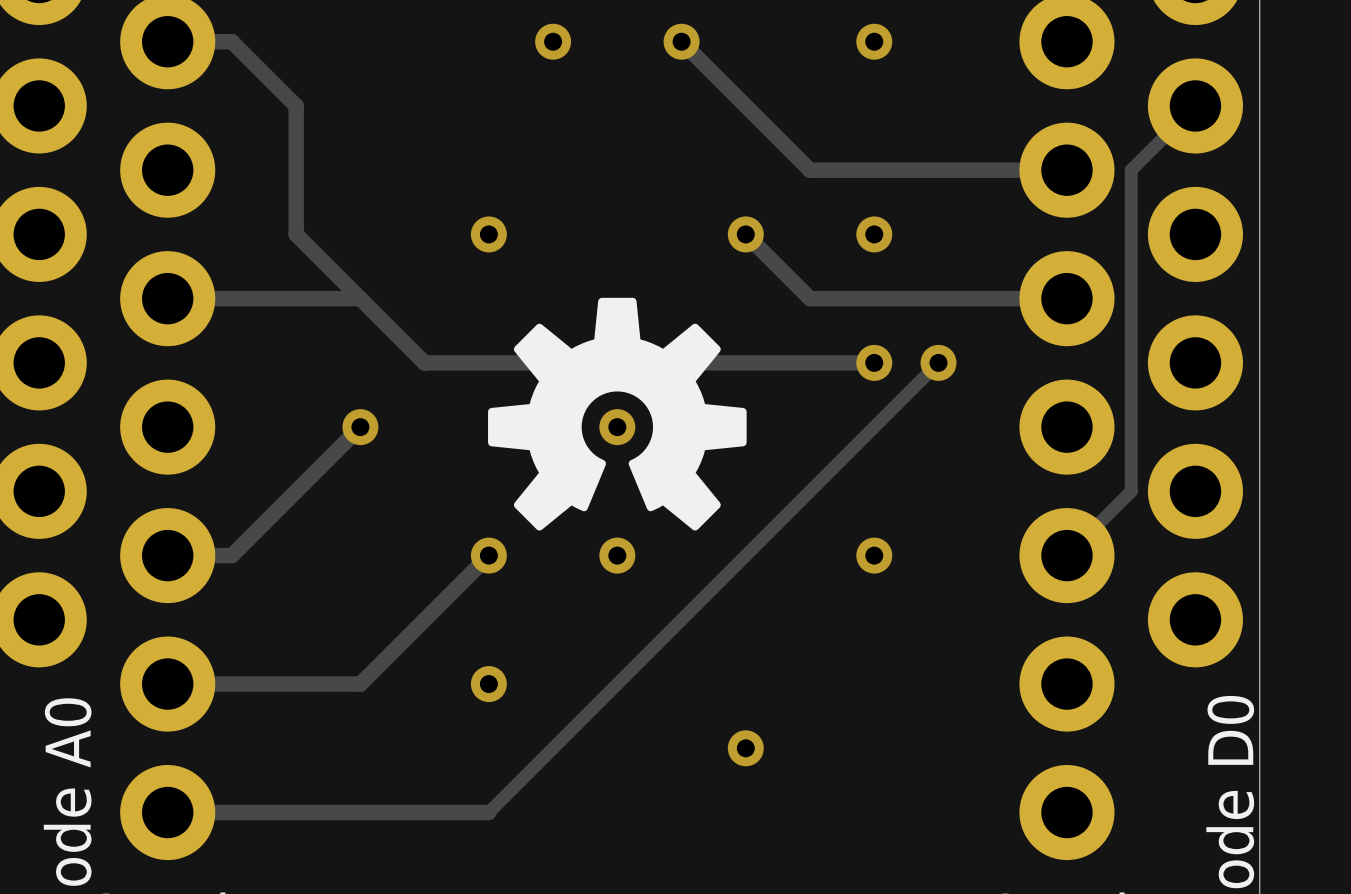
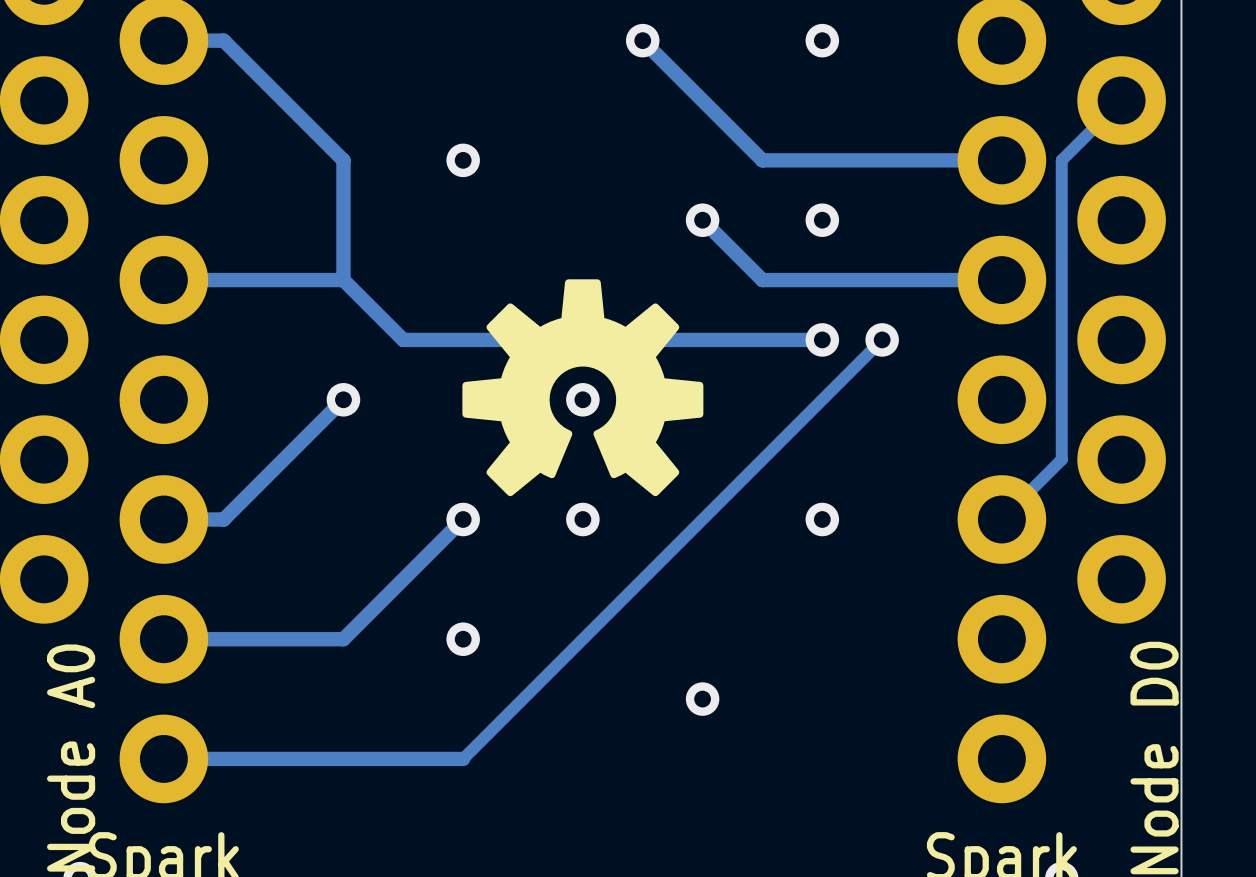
via: (553, 41) -> none
track: (296, 105) (296, 234) (360, 298) -> (283, 100) (343, 160) (343, 280)
via position: (488, 234) -> (463, 160)

